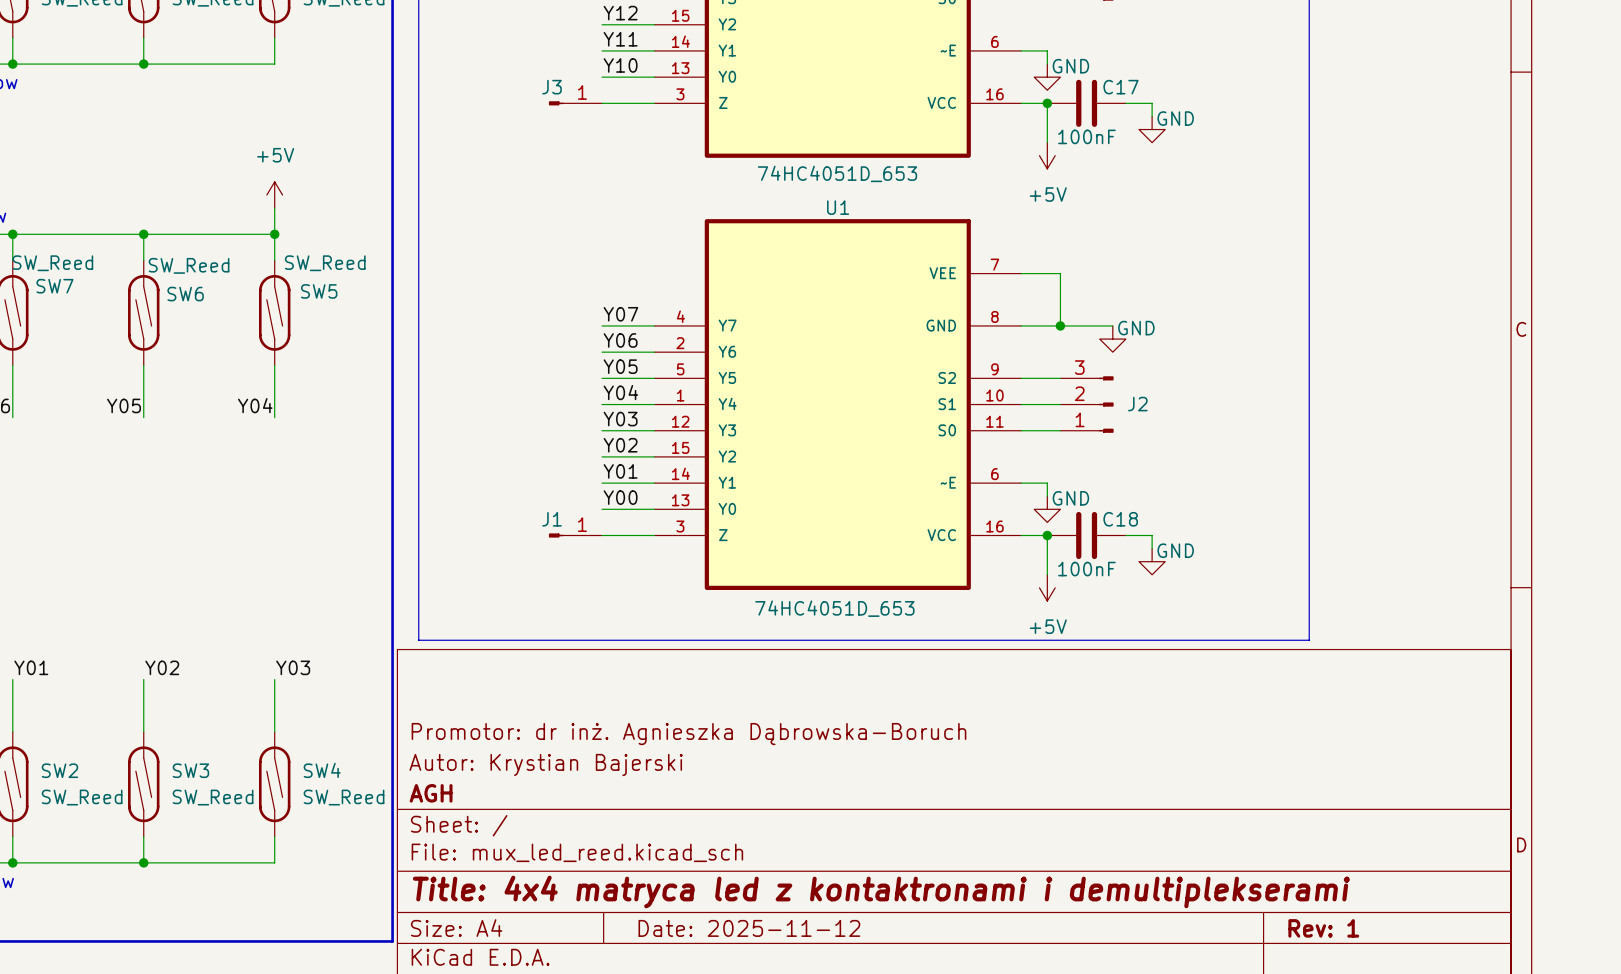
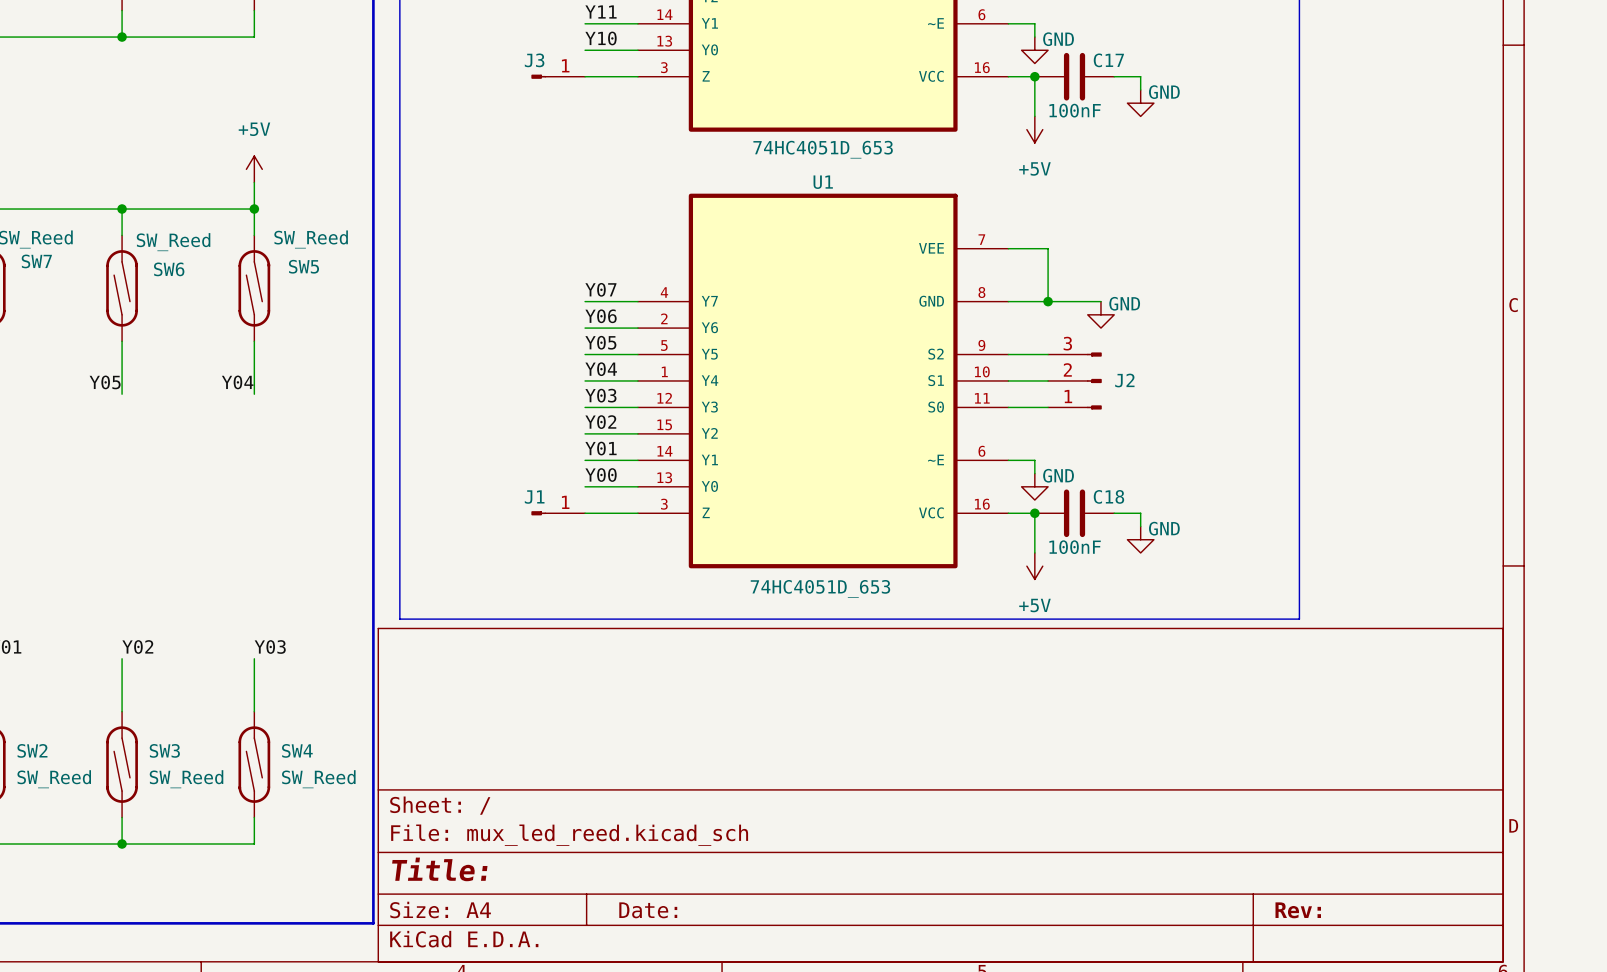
title block: Promotor: dr inż. Agnieszka Dąbrowska-Boruch (689, 734) -> none
title block: Autor: Krystian Bajerski (546, 764) -> none
title block: AGH (431, 793) -> none
title block: Title: 4x4 matryca led z kontaktronami i demultiplekserami (881, 891) -> Title: (439, 869)
title block: Date: 2025-11-12 (749, 928) -> Date: (648, 910)
title block: Rev: 1 (1323, 928) -> Rev: (1298, 910)

